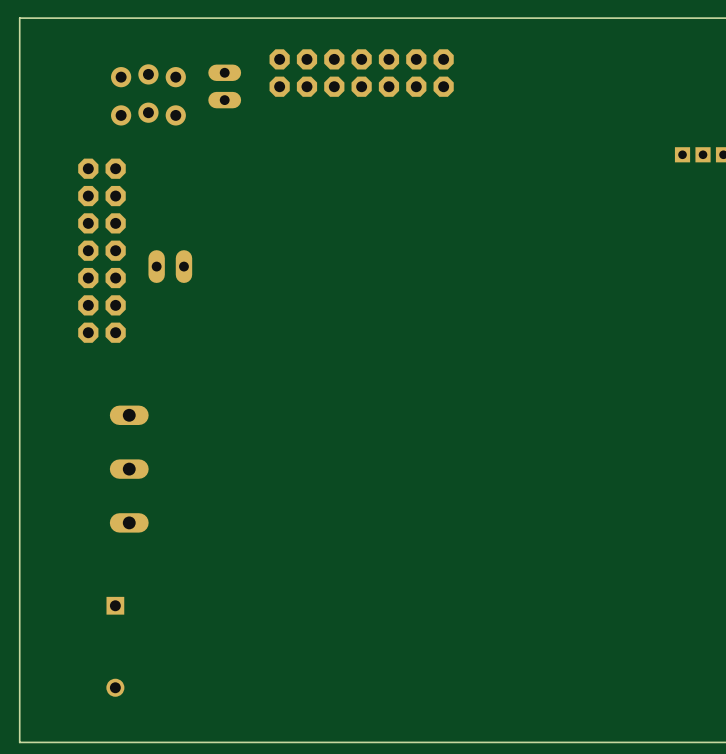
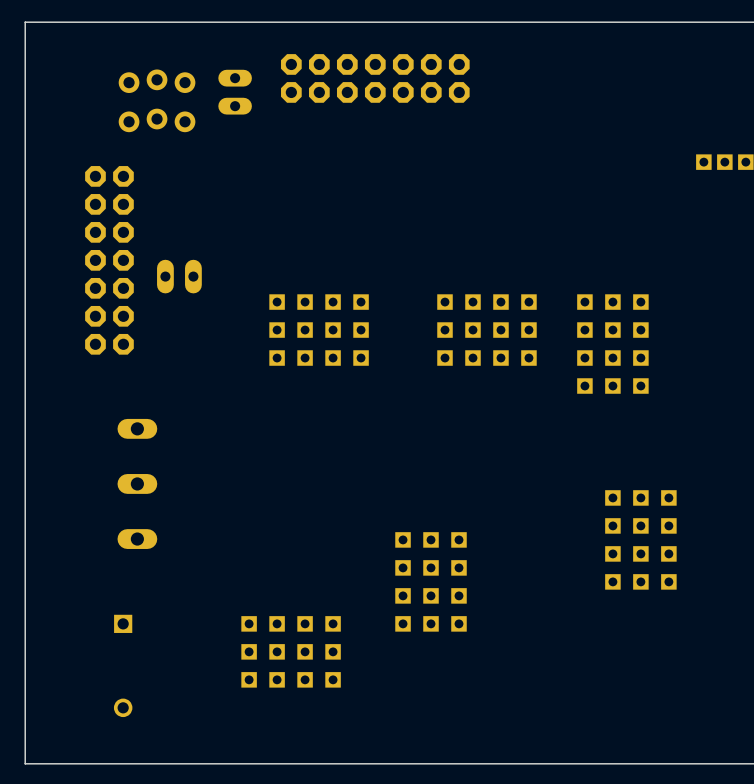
part: none -> (319, 330)
part: none -> (486, 330)
part: none -> (612, 344)
part: none -> (640, 539)
part: none -> (431, 581)
part: none -> (291, 651)

